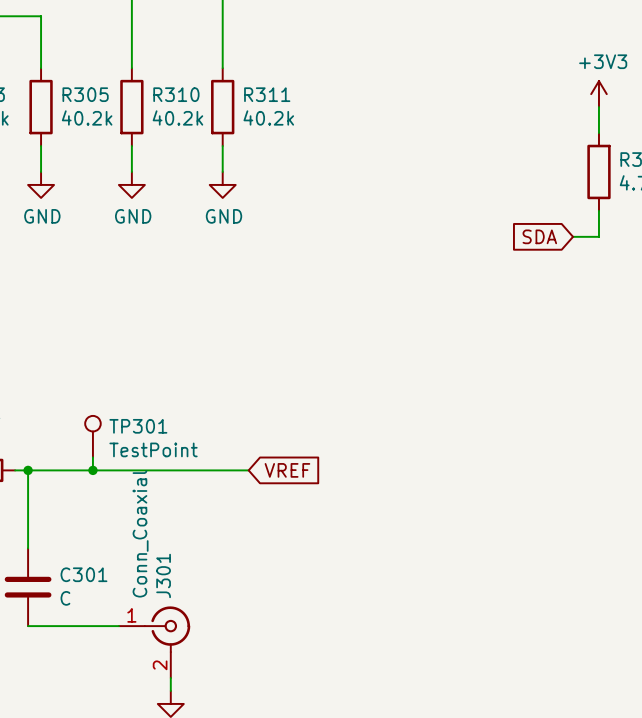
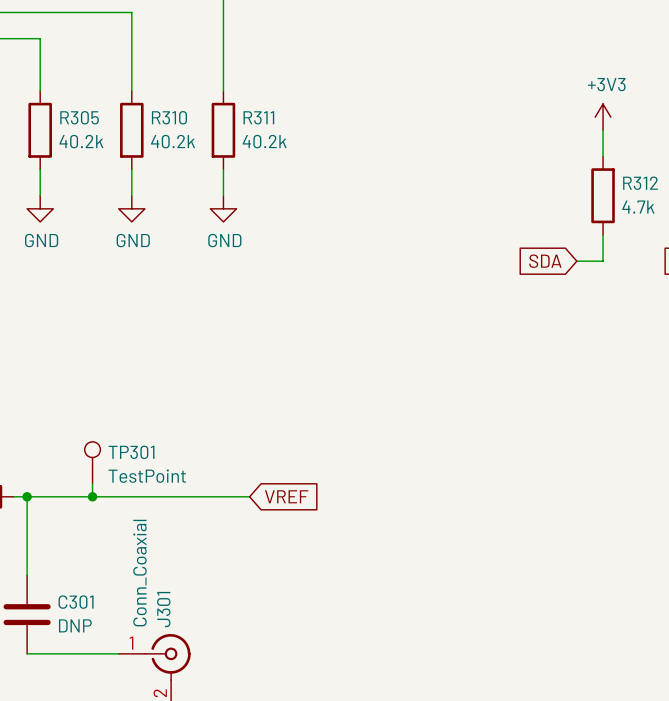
C301 value: C (65, 598) -> DNP (75, 625)

